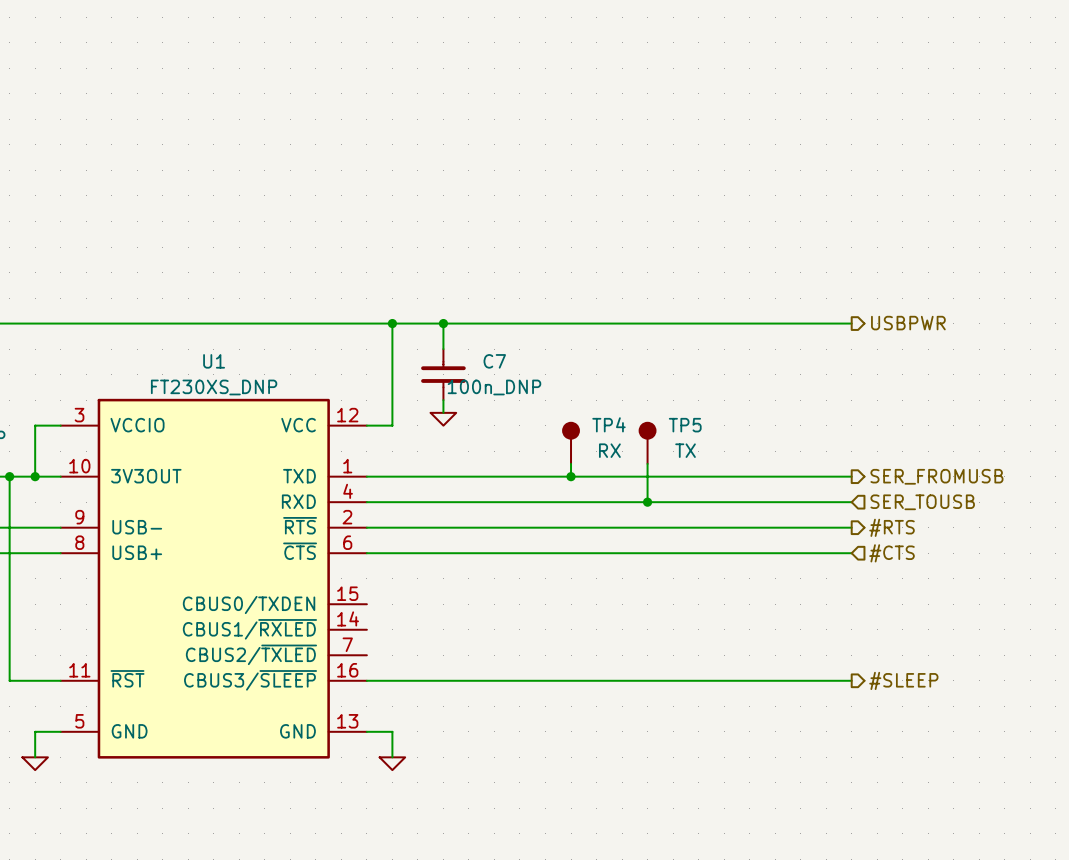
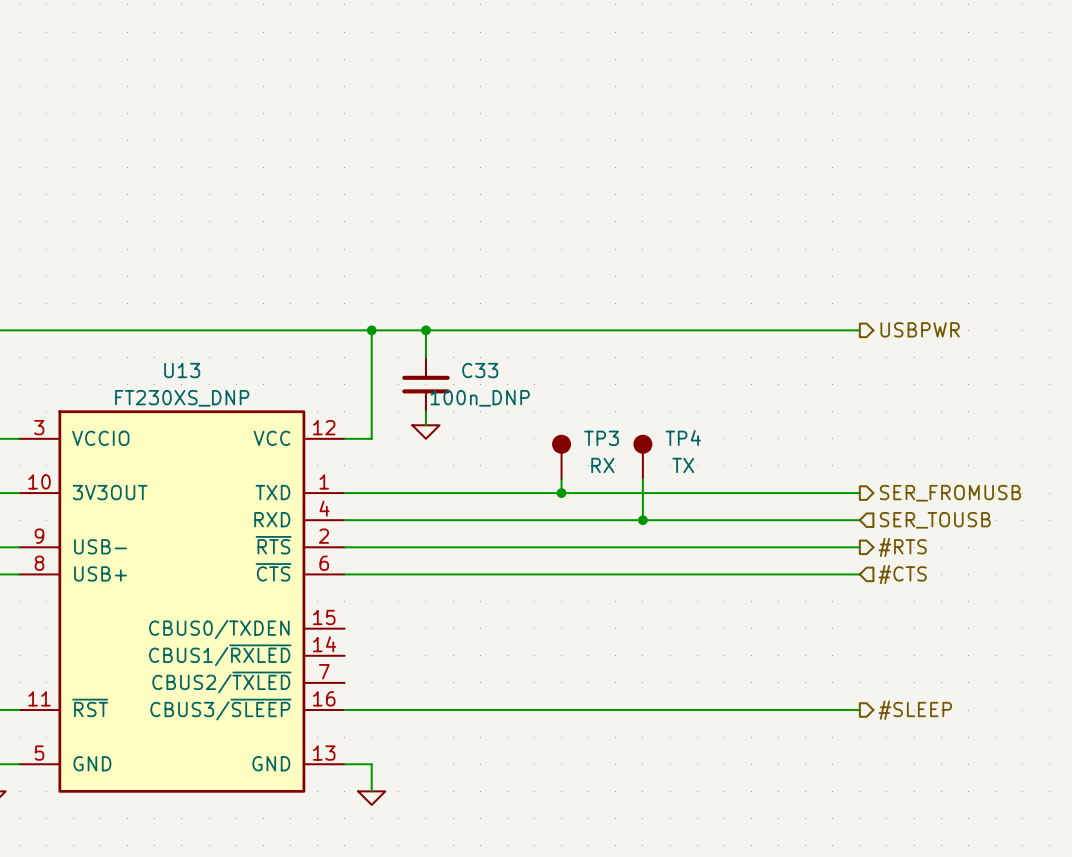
U1 name: U1 (214, 361) -> U13 (182, 370)
C7 name: C7 (494, 361) -> C33 (480, 370)
TP4 name: TP4 (608, 424) -> TP3 (601, 438)
TP5 name: TP5 (685, 425) -> TP4 (683, 438)

